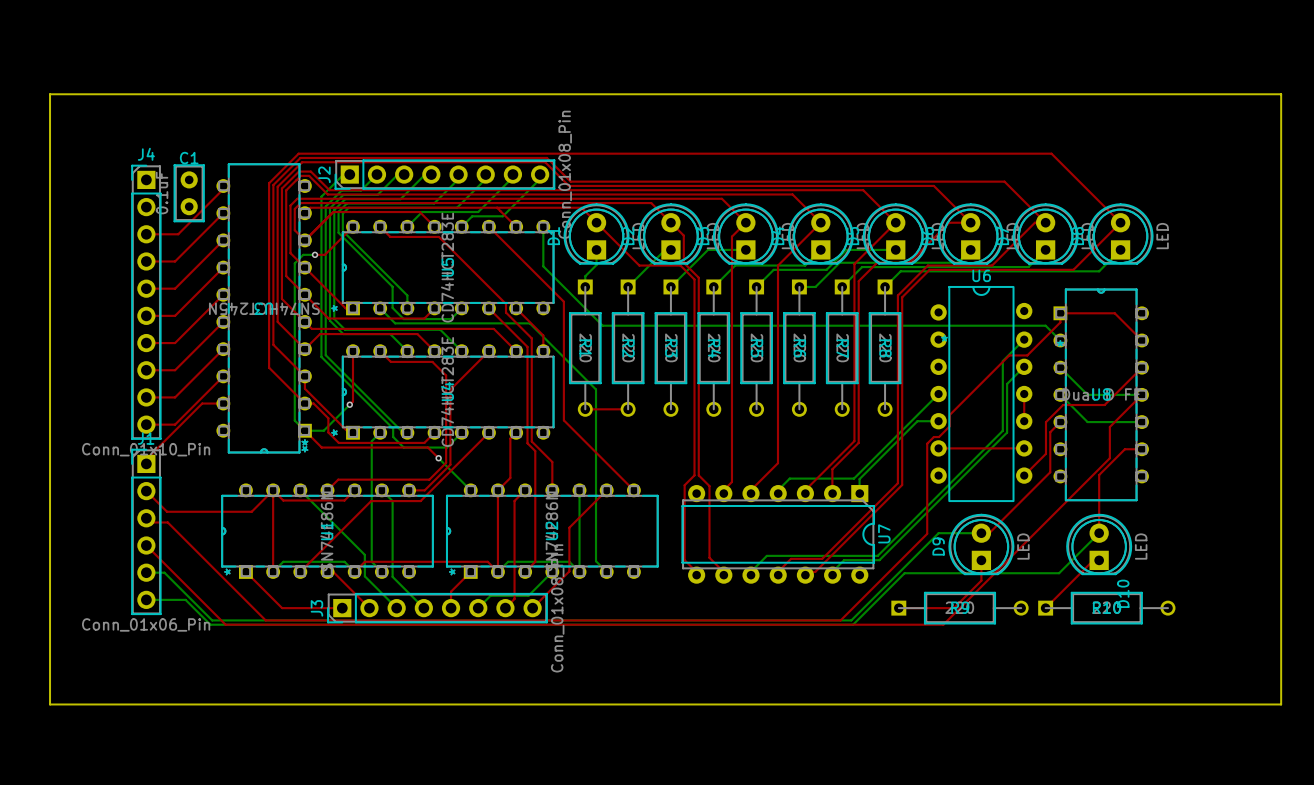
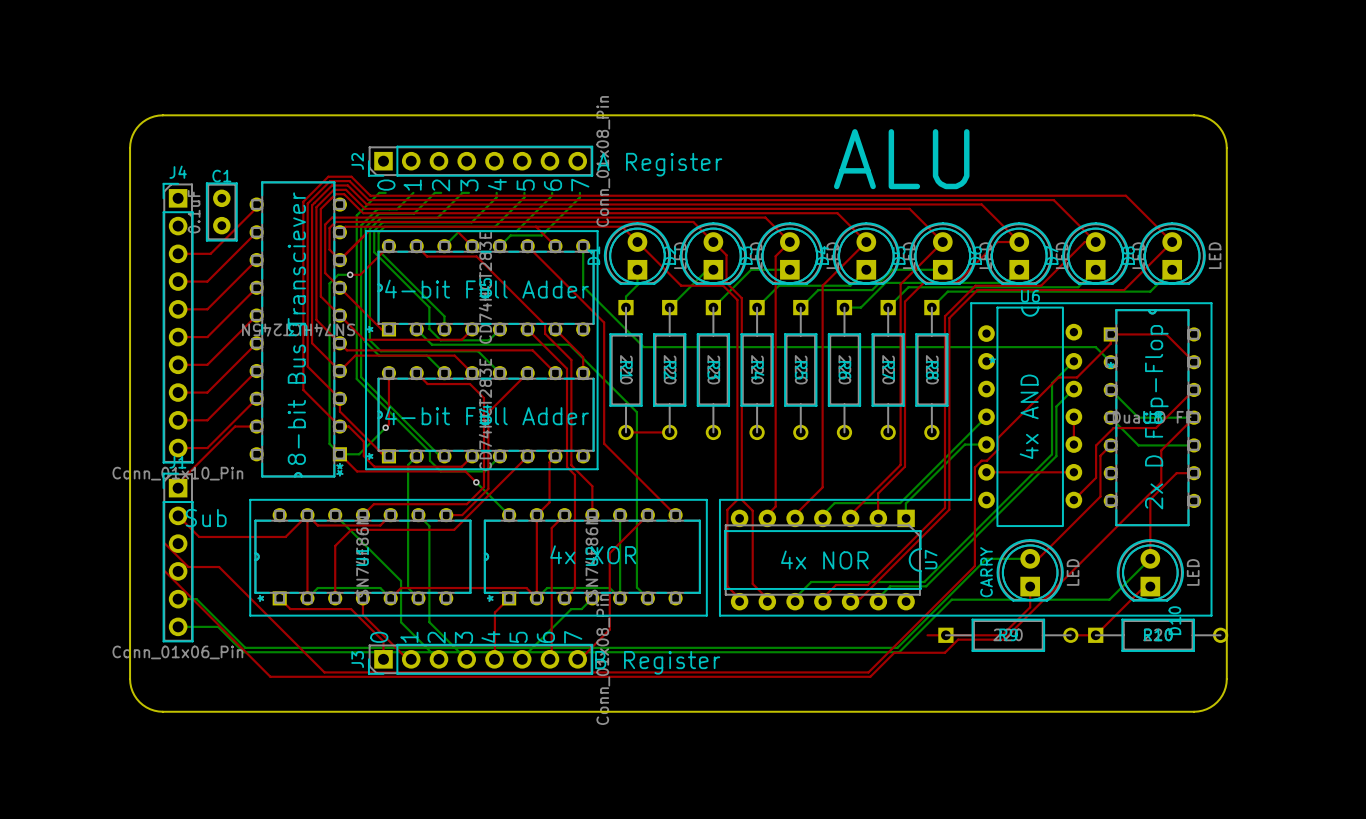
board edge: (50, 94) (1281, 94) (1281, 704) (50, 704) (50, 94) -> (162, 115) (150, 117) (139, 124) (132, 135) (130, 148) (130, 678) (134, 695) (146, 707) (162, 711) (1194, 711) (1210, 707) (1222, 695) (1226, 678) (1226, 148) (1222, 131) (1210, 119) (1194, 115) (162, 115)
text: none -> ALU (901, 159)
text: none -> A Register (659, 164)
top track: (293, 158) (298, 153) (1051, 153) (1075, 177) -> (328, 176) (351, 176) (370, 195) (1125, 195)
top track: (295, 163) (300, 157) (547, 157) (570, 181) -> (330, 181) (349, 181) (368, 200) (611, 200)
text: none -> 0 (386, 185)
text: none -> 1 (412, 185)
text: none -> 4 (497, 184)
text: none -> 5 (525, 185)
text: none -> 6 (552, 185)
text: none -> 7 (580, 185)
top track: (297, 167) (302, 162) (545, 162) (568, 185) -> (331, 185) (347, 185) (366, 204) (609, 204)
text: none -> 2 (441, 185)
text: none -> 3 (469, 185)
J2 position: (444, 174) -> (480, 161)
line: none -> (366, 231) (366, 469) (597, 469) (597, 231) (366, 231)
text: none -> 4-bit Full Adder (486, 289)
line: none -> (971, 303) (1211, 303) (1211, 615) (719, 615) (719, 499) (971, 499) (971, 303)
text: none -> 8-bit Bus Transciever (296, 328)
text: none -> 4-bit Full Adder (486, 415)
text: none -> 4x AND (1029, 416)
text: none -> 2x D Flip-Flop (1156, 417)
line: none -> (250, 499) (706, 499) (706, 615) (250, 615) (250, 499)
text: none -> Sub (206, 518)
top track: (514, 500) (514, 599) (505, 608) -> (553, 525) (551, 528) (551, 657) (549, 659)
top track: (420, 501) (371, 501) (300, 571) -> (457, 526) (454, 529) (351, 529) (335, 545) (335, 598)
top track: (146, 518) (150, 522) (167, 522) (186, 541) -> (165, 543) (188, 567) (219, 567)
text: none -> 4x XOR (593, 554)
top track: (927, 533) (840, 620) (265, 620) -> (974, 559) (974, 566) (868, 672) (324, 672) (299, 647)
text: none -> 4x NOR (824, 560)
top track: (146, 545) (225, 624) (943, 624) (955, 612) -> (165, 571) (270, 676) (870, 676) (894, 652) (944, 652) (958, 639) (1003, 639)
D9 name: D9 (938, 546) -> CARRY (986, 572)
top track: (327, 571) (333, 571) (369, 608) -> (362, 598) (362, 614) (407, 659) (411, 659)
top track: (569, 571) (532, 608) -> (609, 597) (609, 629) (580, 659) (577, 659)
bottom track: (364, 576) (396, 608) -> (401, 602) (401, 622) (438, 659)
bottom track: (392, 576) (423, 608) -> (429, 603) (429, 622) (466, 659)
top track: (256, 582) (282, 608) (342, 608) -> (290, 609) (351, 609) (383, 641) (383, 659)
bottom track: (541, 582) (528, 595) (490, 595) (478, 608) -> (581, 609) (571, 609) (522, 659)
top track: (456, 585) (451, 591) (451, 608) -> (494, 612) (494, 659)
J3 position: (437, 608) -> (480, 659)
top track: none -> (927, 635) (945, 635)
top track: none -> (1076, 635) (1095, 635)
text: none -> 4 (490, 636)
text: none -> 0 (379, 637)
text: none -> 1 (409, 637)
text: none -> 2 (436, 637)
text: none -> 3 (463, 637)
text: none -> 5 (518, 637)
text: none -> 6 (545, 637)
text: none -> 7 (573, 637)
text: none -> B Register (657, 662)

